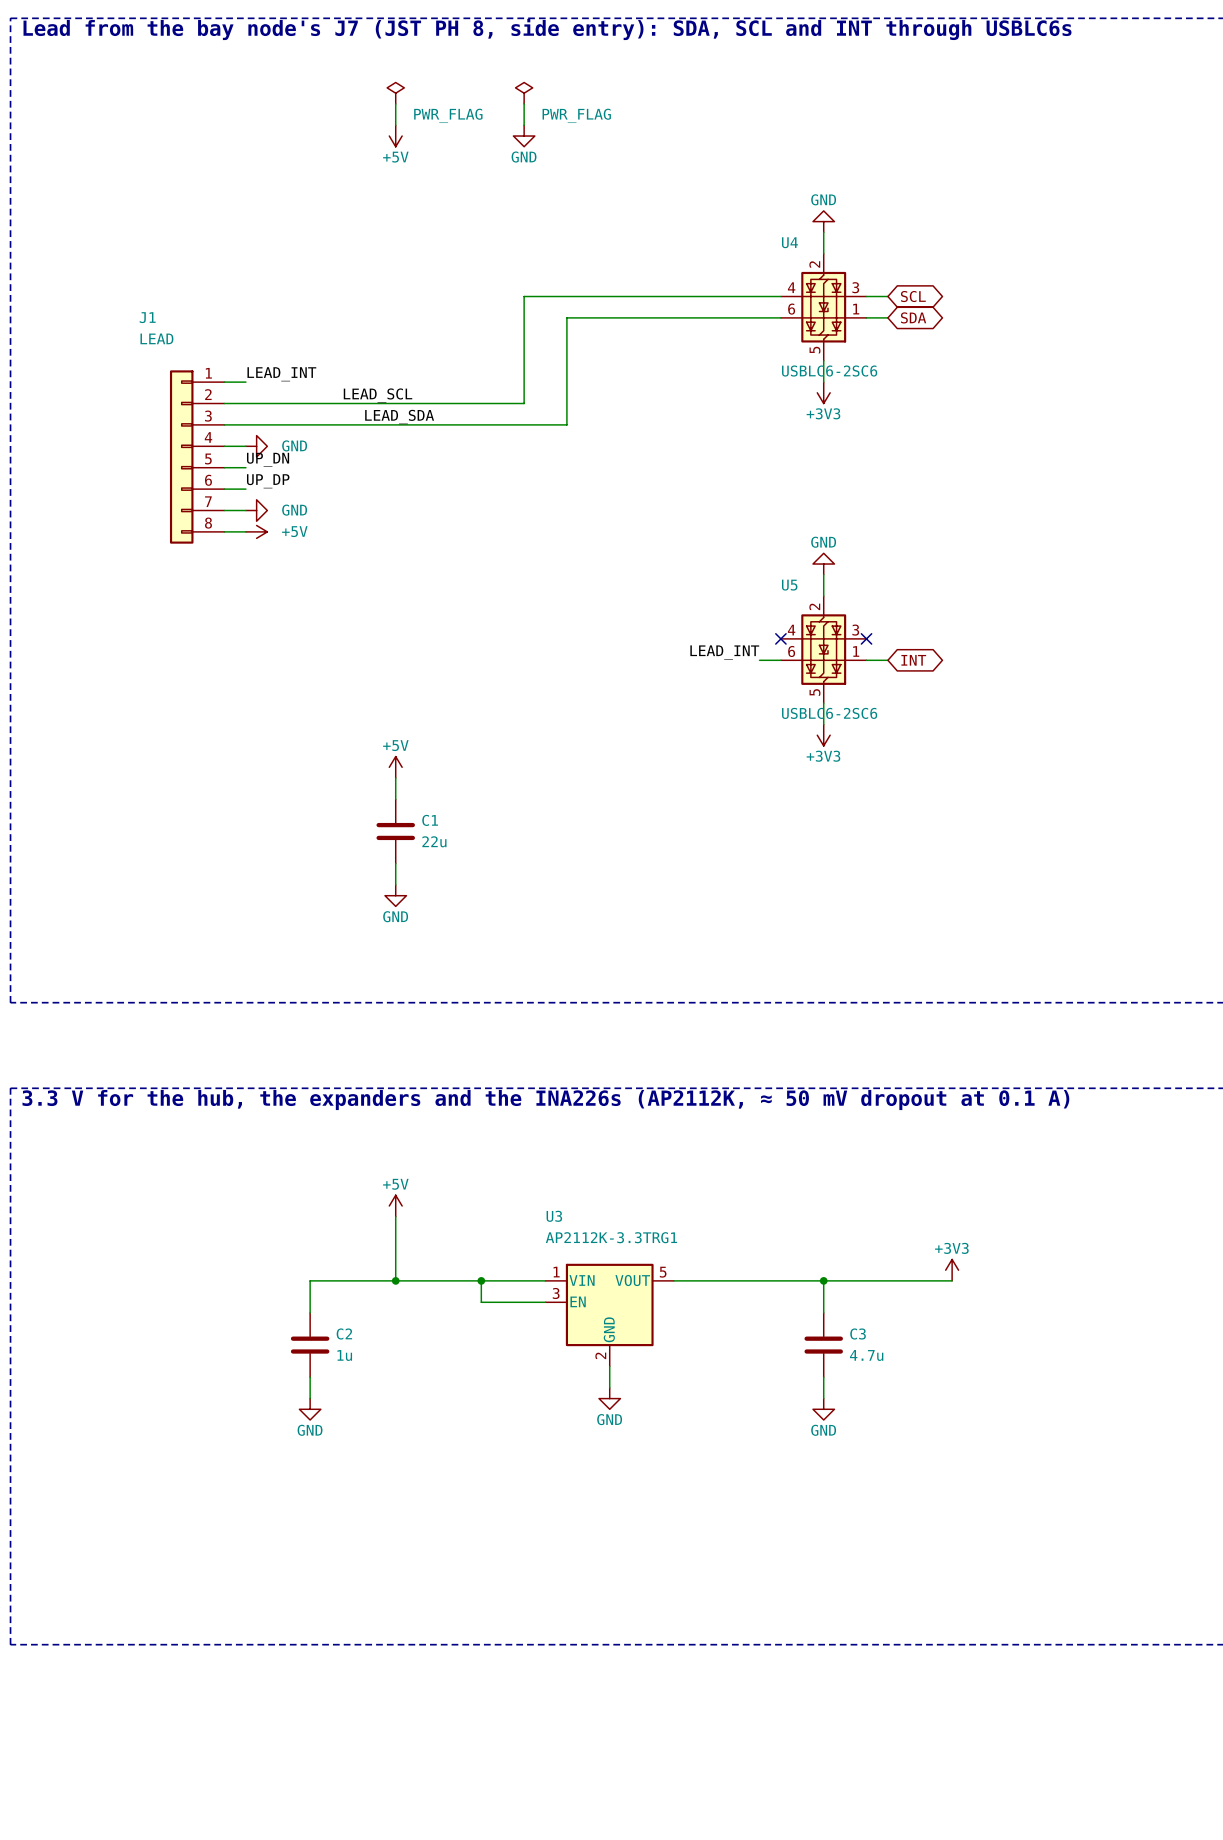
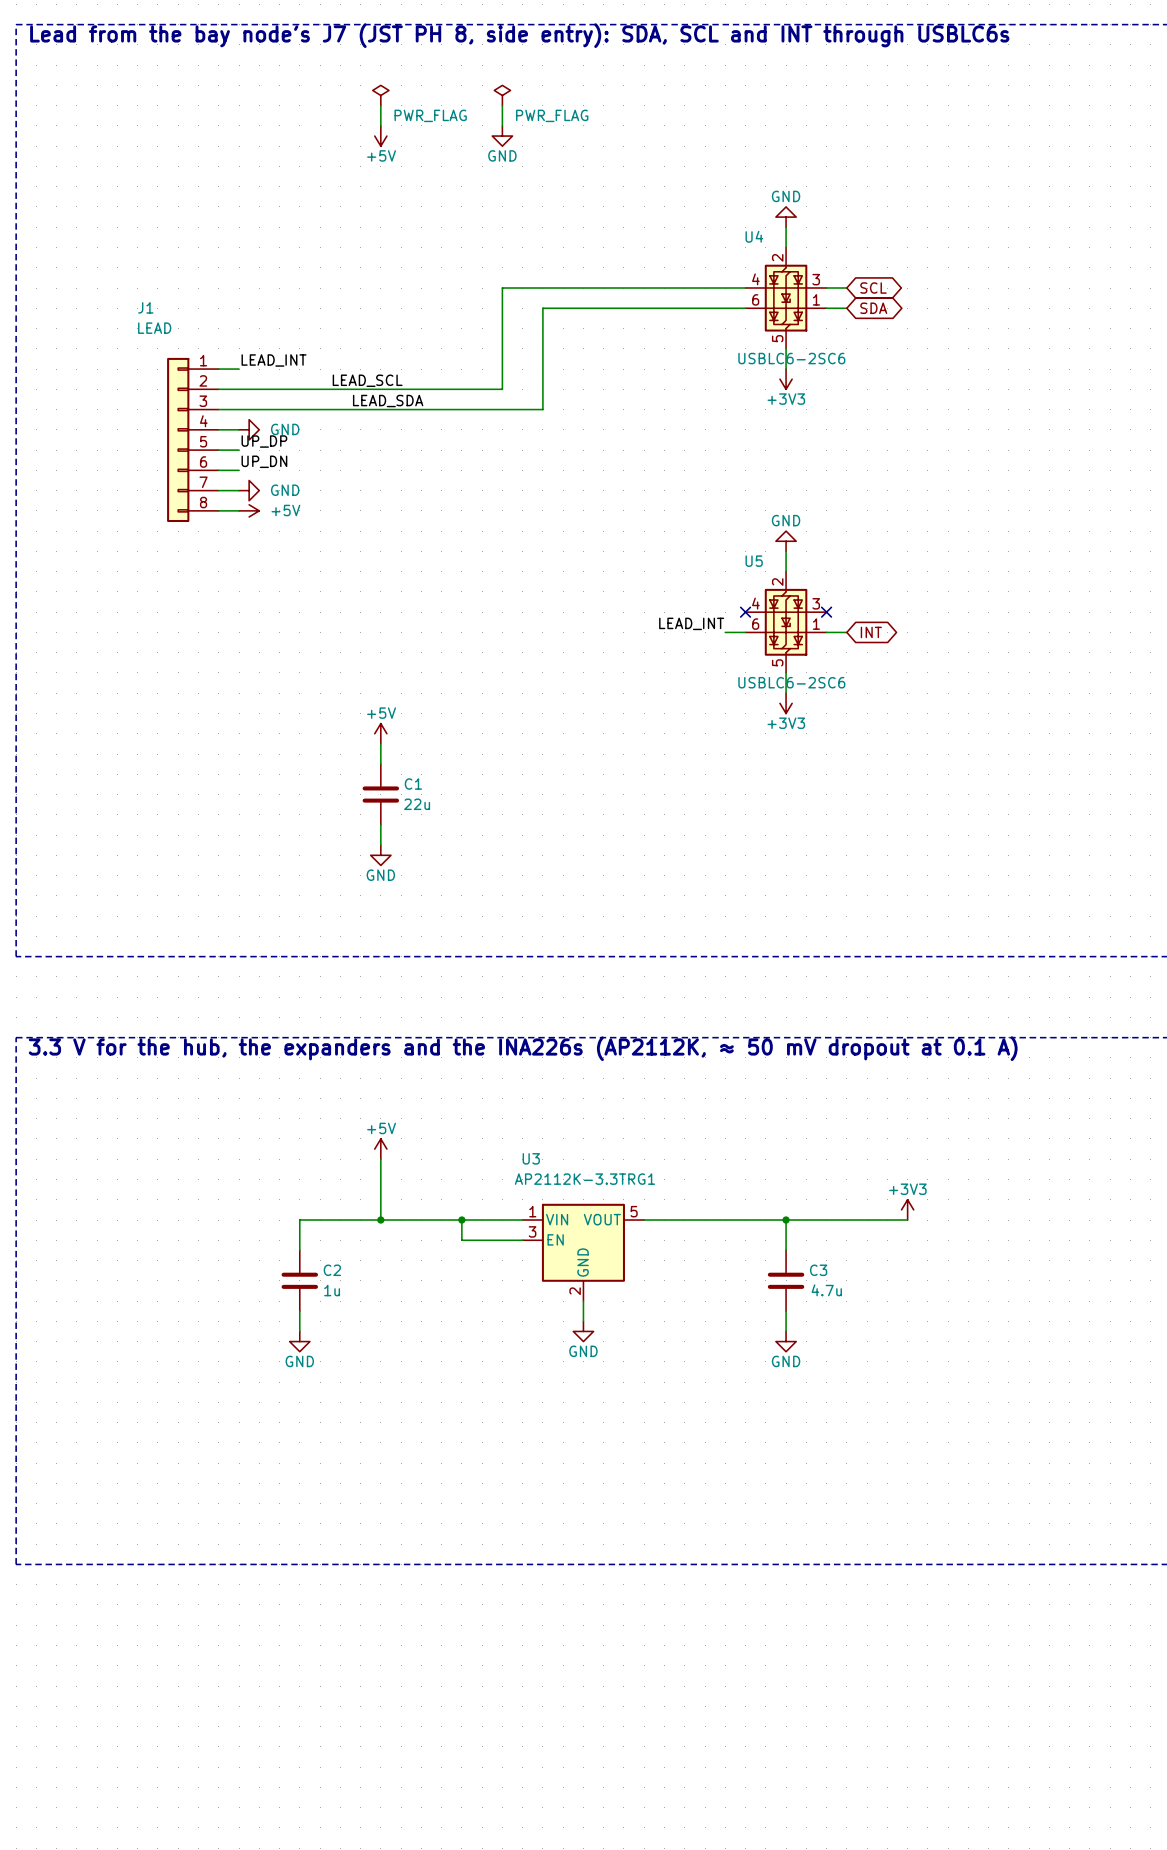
label: UP_DN (268, 459) -> UP_DP (264, 441)
label: UP_DP (268, 481) -> UP_DN (264, 461)

